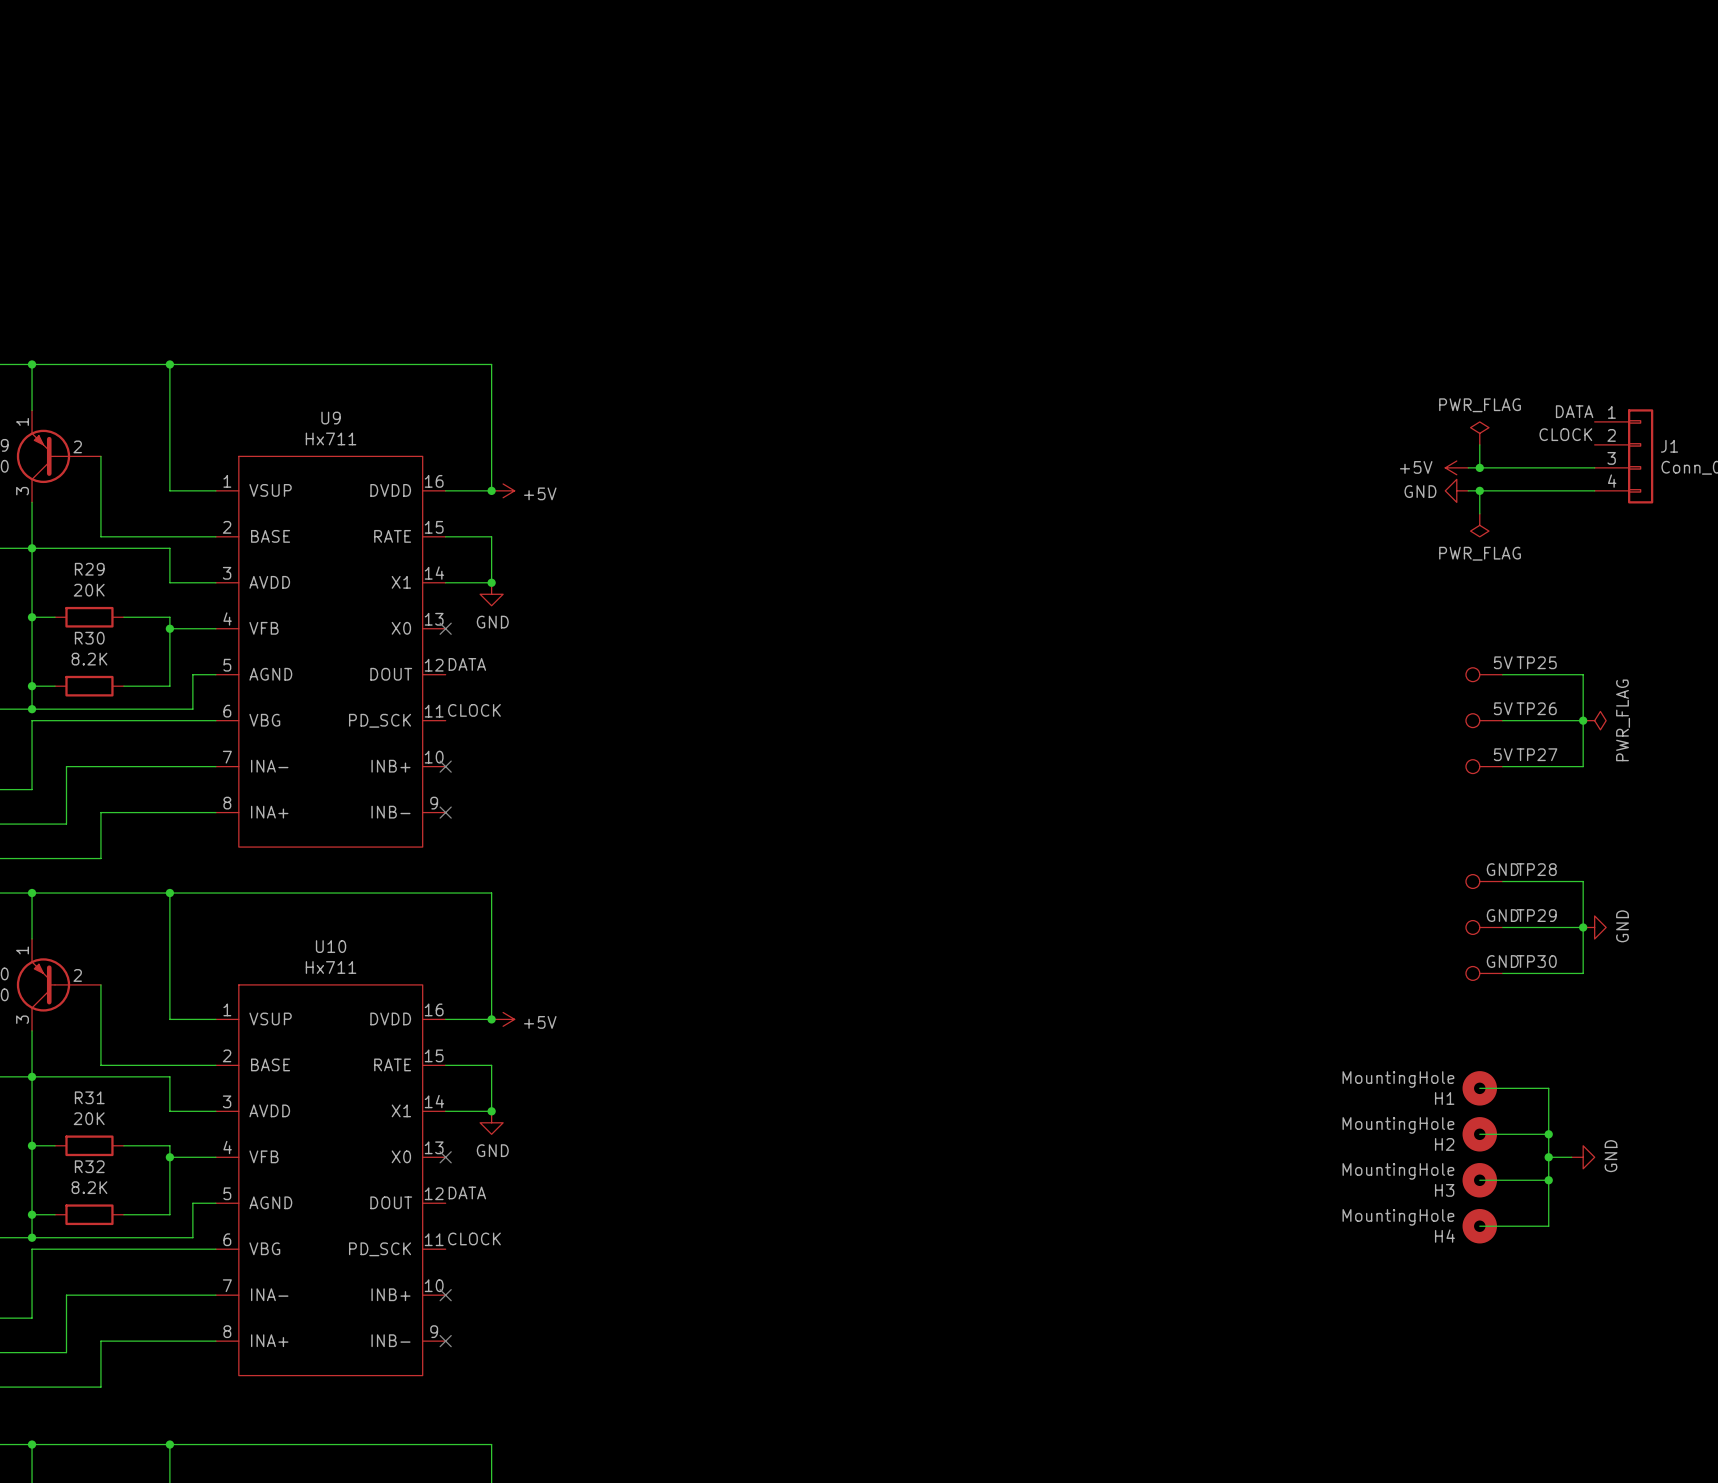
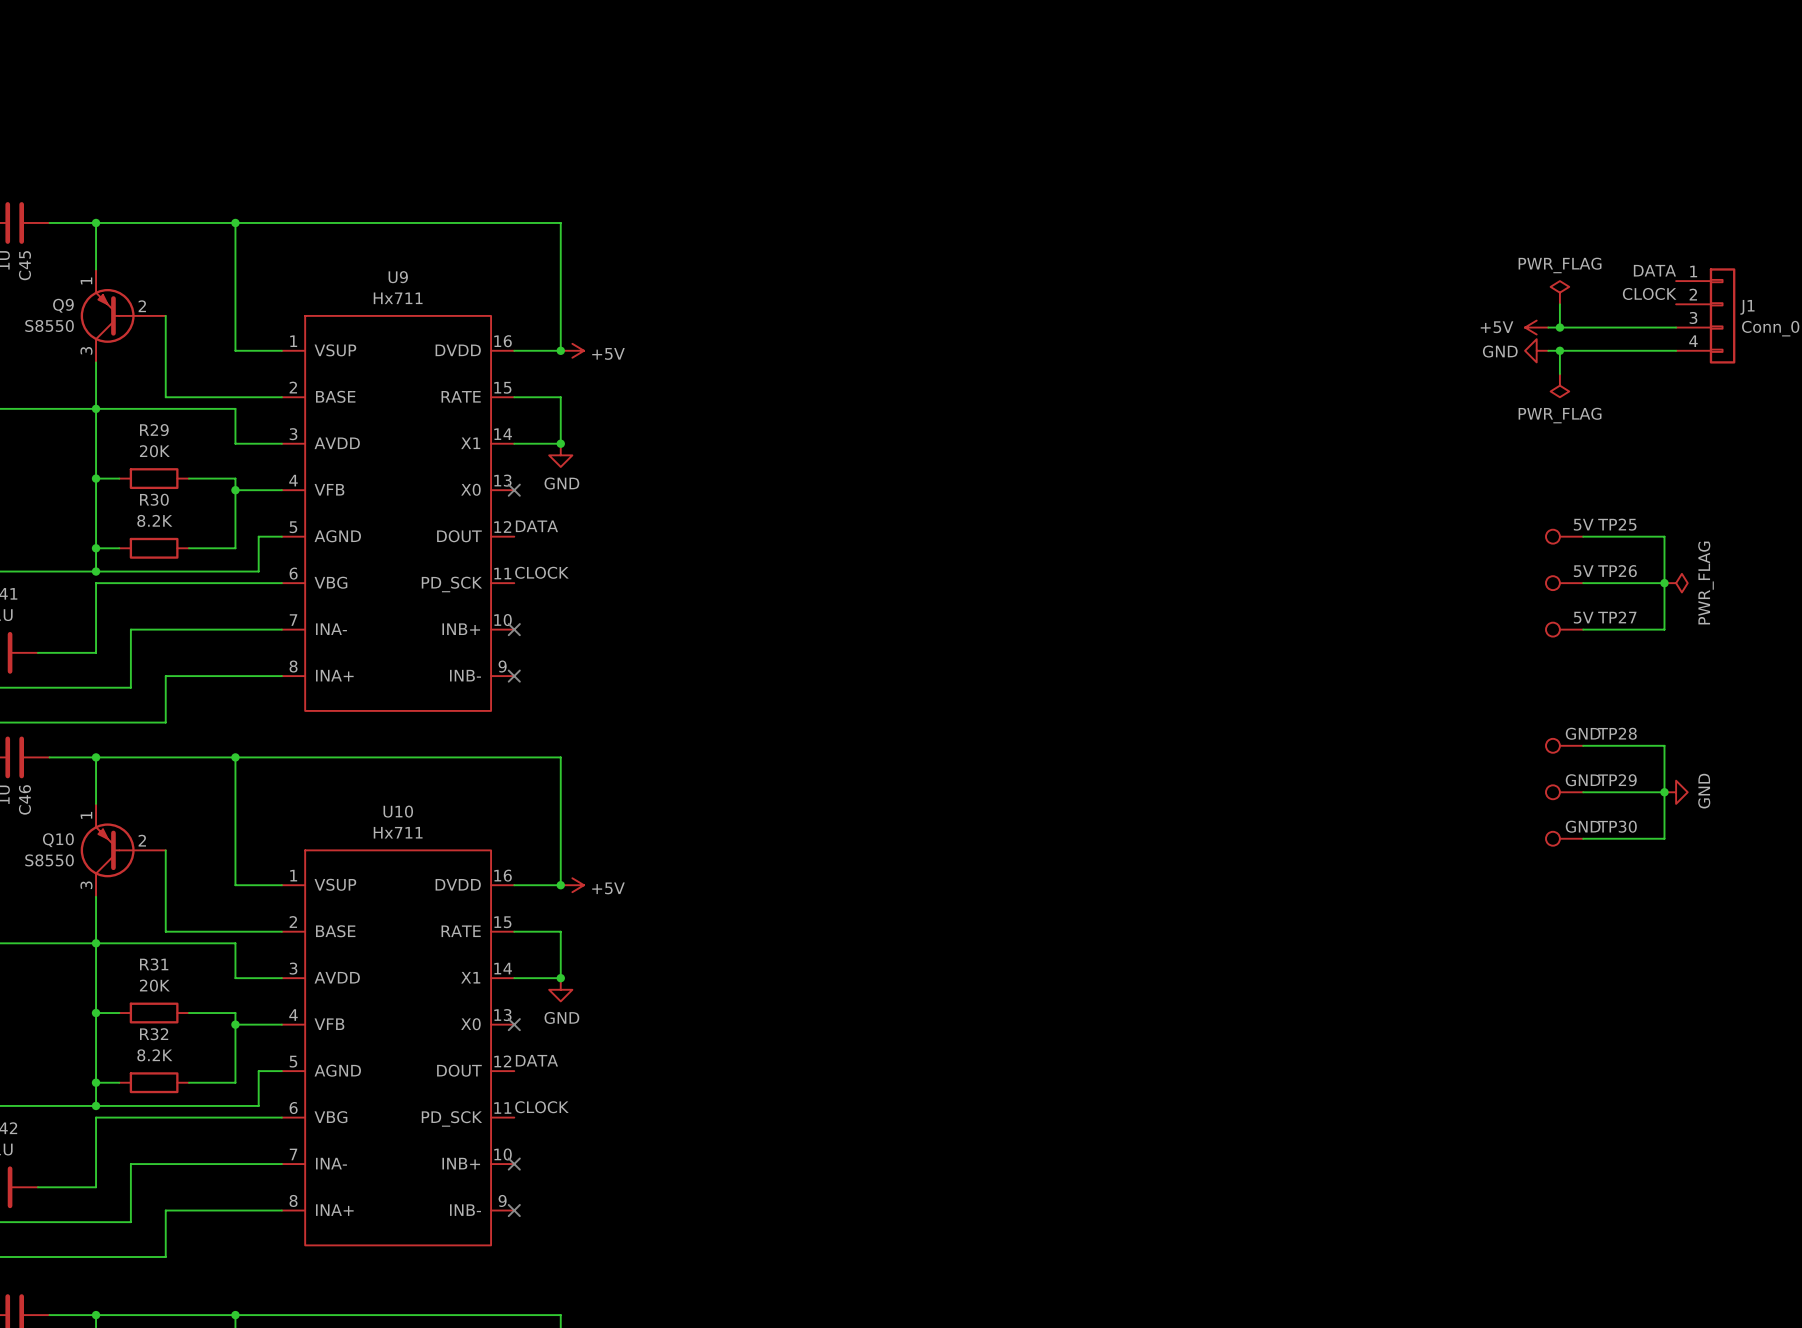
wire: (1479, 1088) (1548, 1088) (1548, 1226) (1479, 1226) -> none
H1: MountingHole (1479, 1088) -> none
wire: (1479, 1134) (1548, 1134) -> none
H2: MountingHole (1479, 1134) -> none
junction: (1548, 1134) -> none
wire: (1548, 1157) (1571, 1157) -> none
junction: (1548, 1157) -> none
power symbol: GND (1583, 1157) -> none
wire: (1479, 1180) (1548, 1180) -> none
H3: MountingHole (1479, 1180) -> none
junction: (1548, 1180) -> none
H4: MountingHole (1479, 1226) -> none

